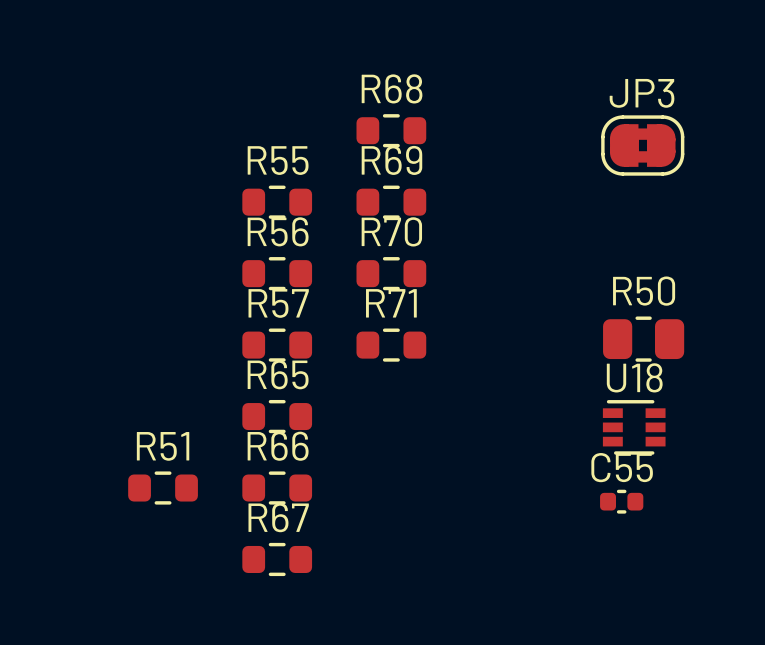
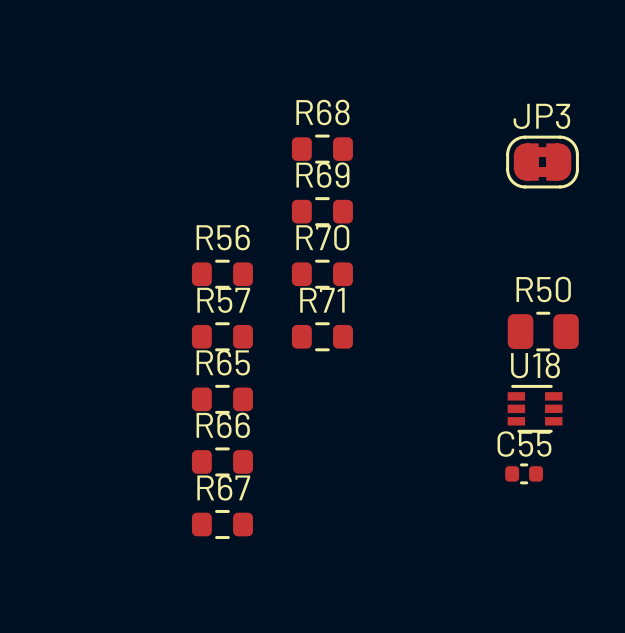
R55: (277, 202) -> none
R51: (163, 488) -> none

